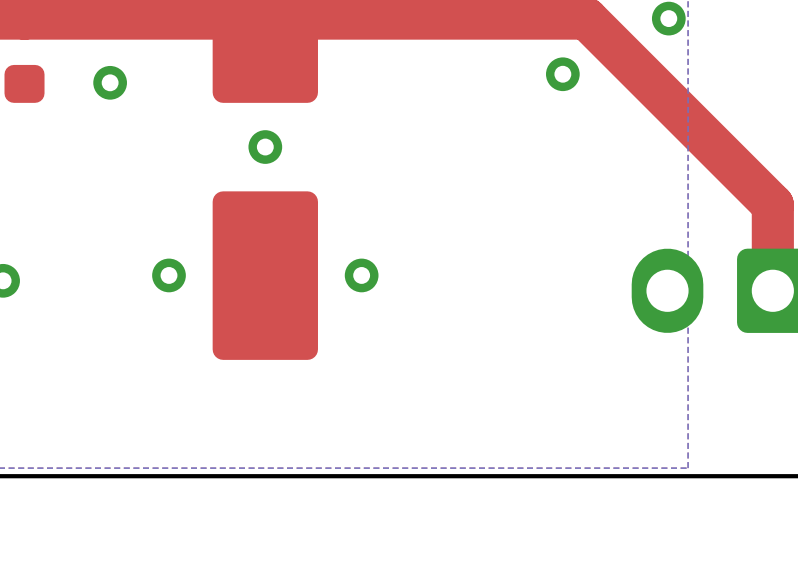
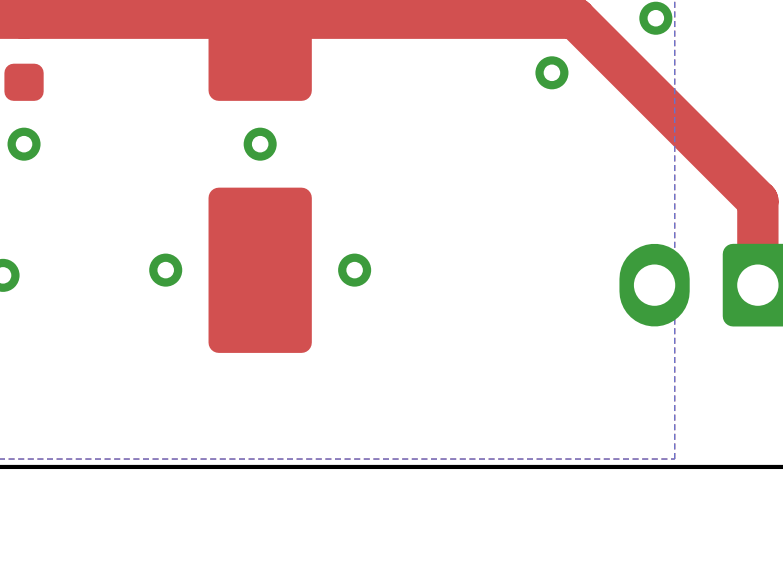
via: (110, 82) -> none
via: none -> (24, 144)

